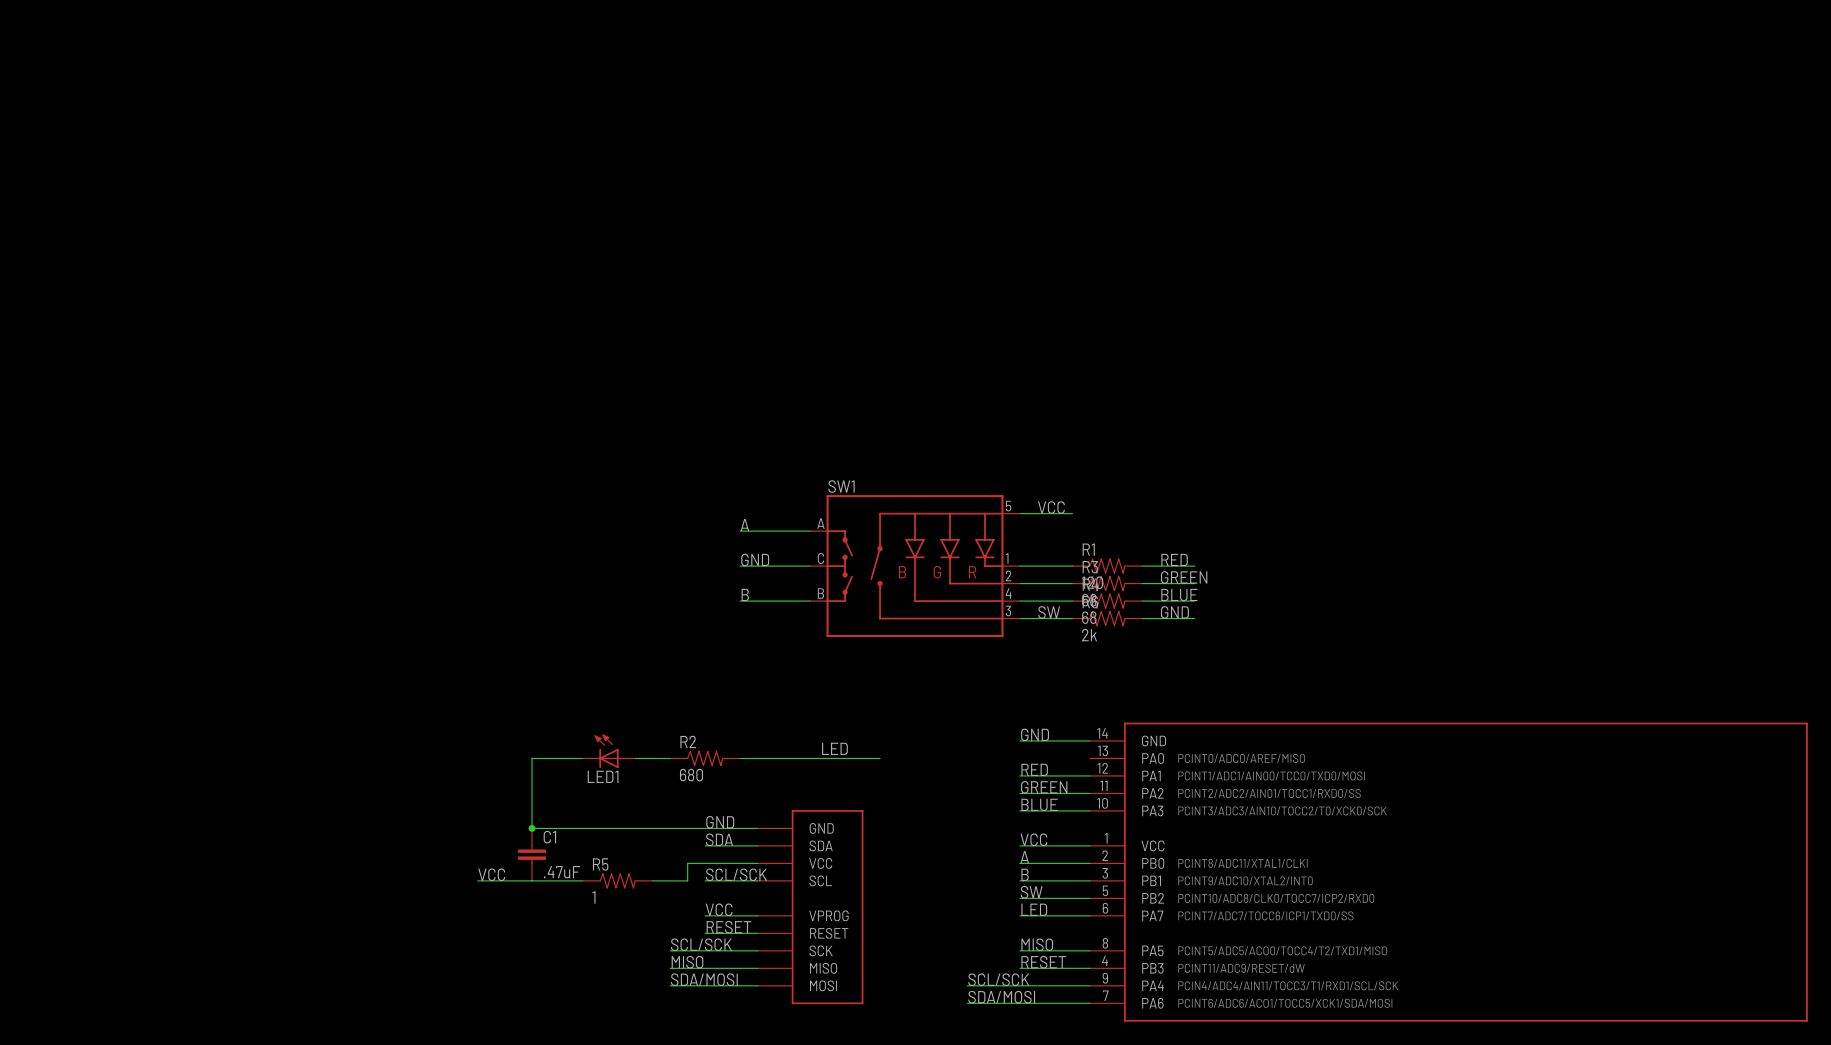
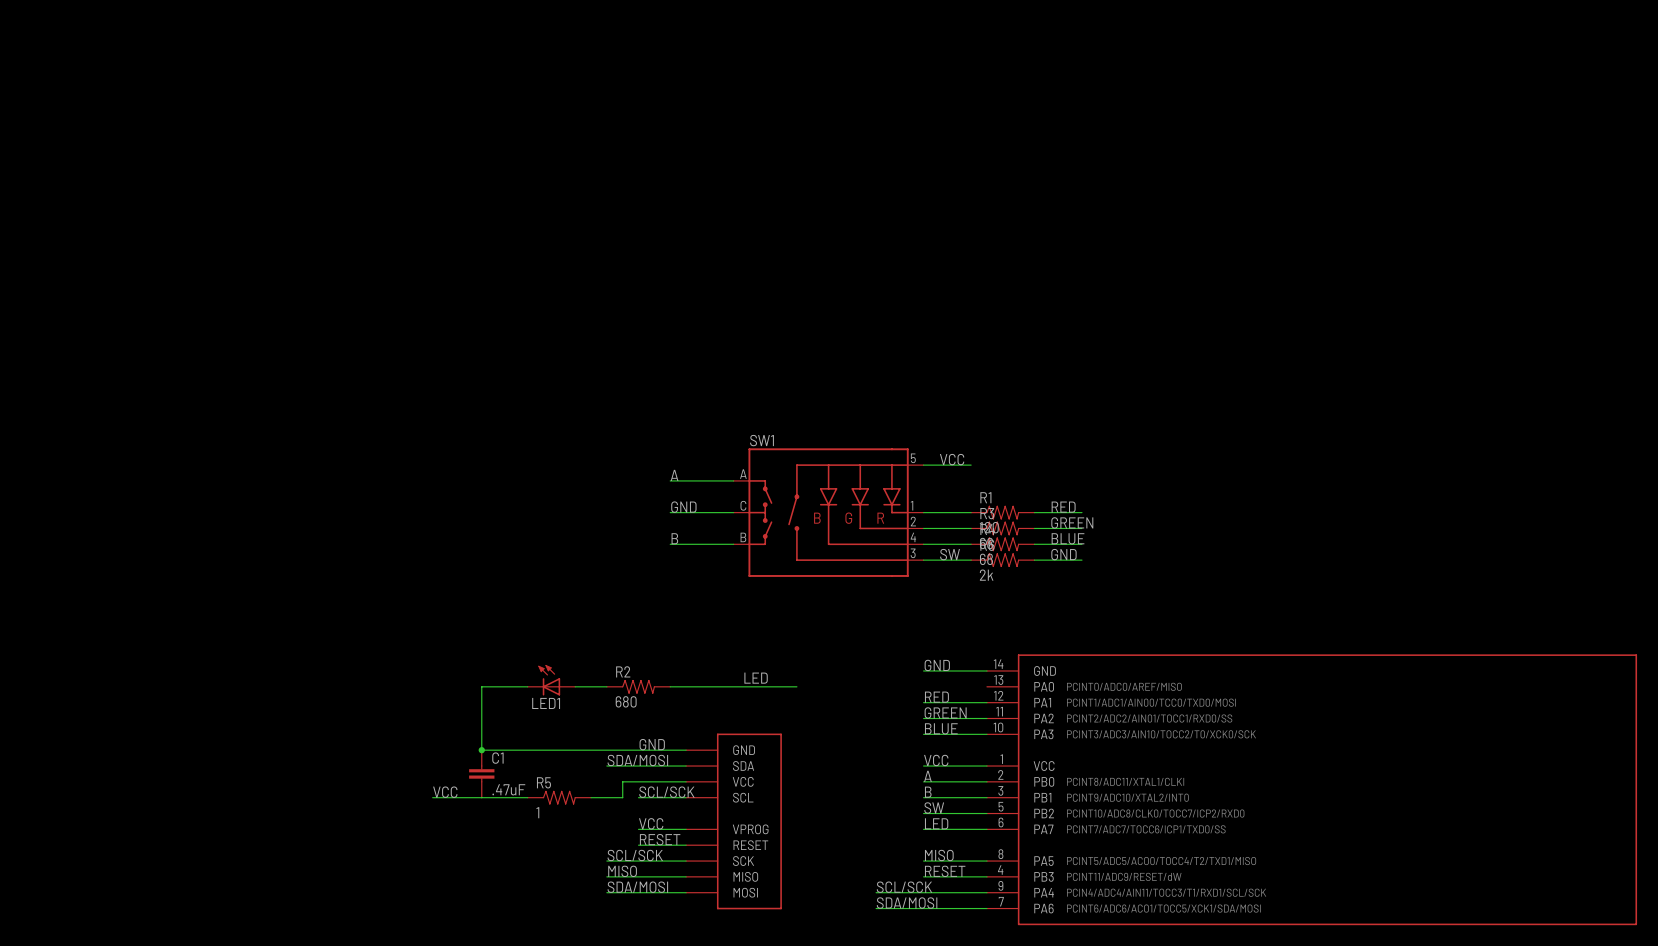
label: none -> SDA/MOSI (637, 760)
label: SDA (719, 839) -> none
wire: none -> (606, 766) (638, 766)

